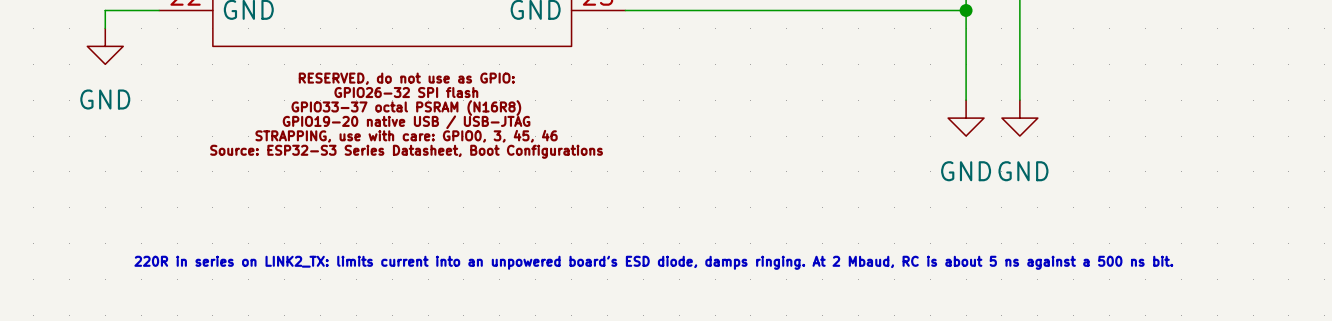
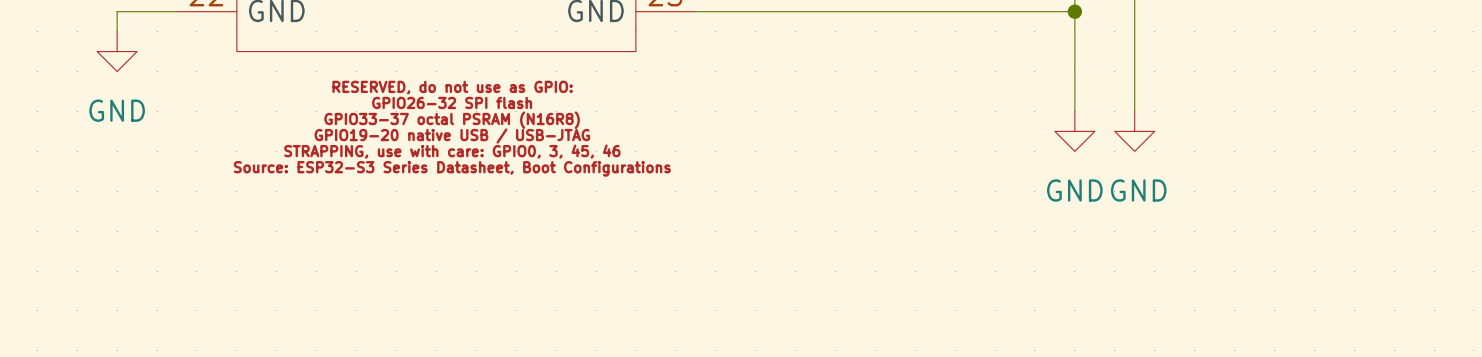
text: 220R in series on LINK2_TX: limits current into an unpowered board's ESD diode, damps ringing. At 2 Mbaud, RC is about 5 ns against a 500 ns bit. (653, 262) -> none

